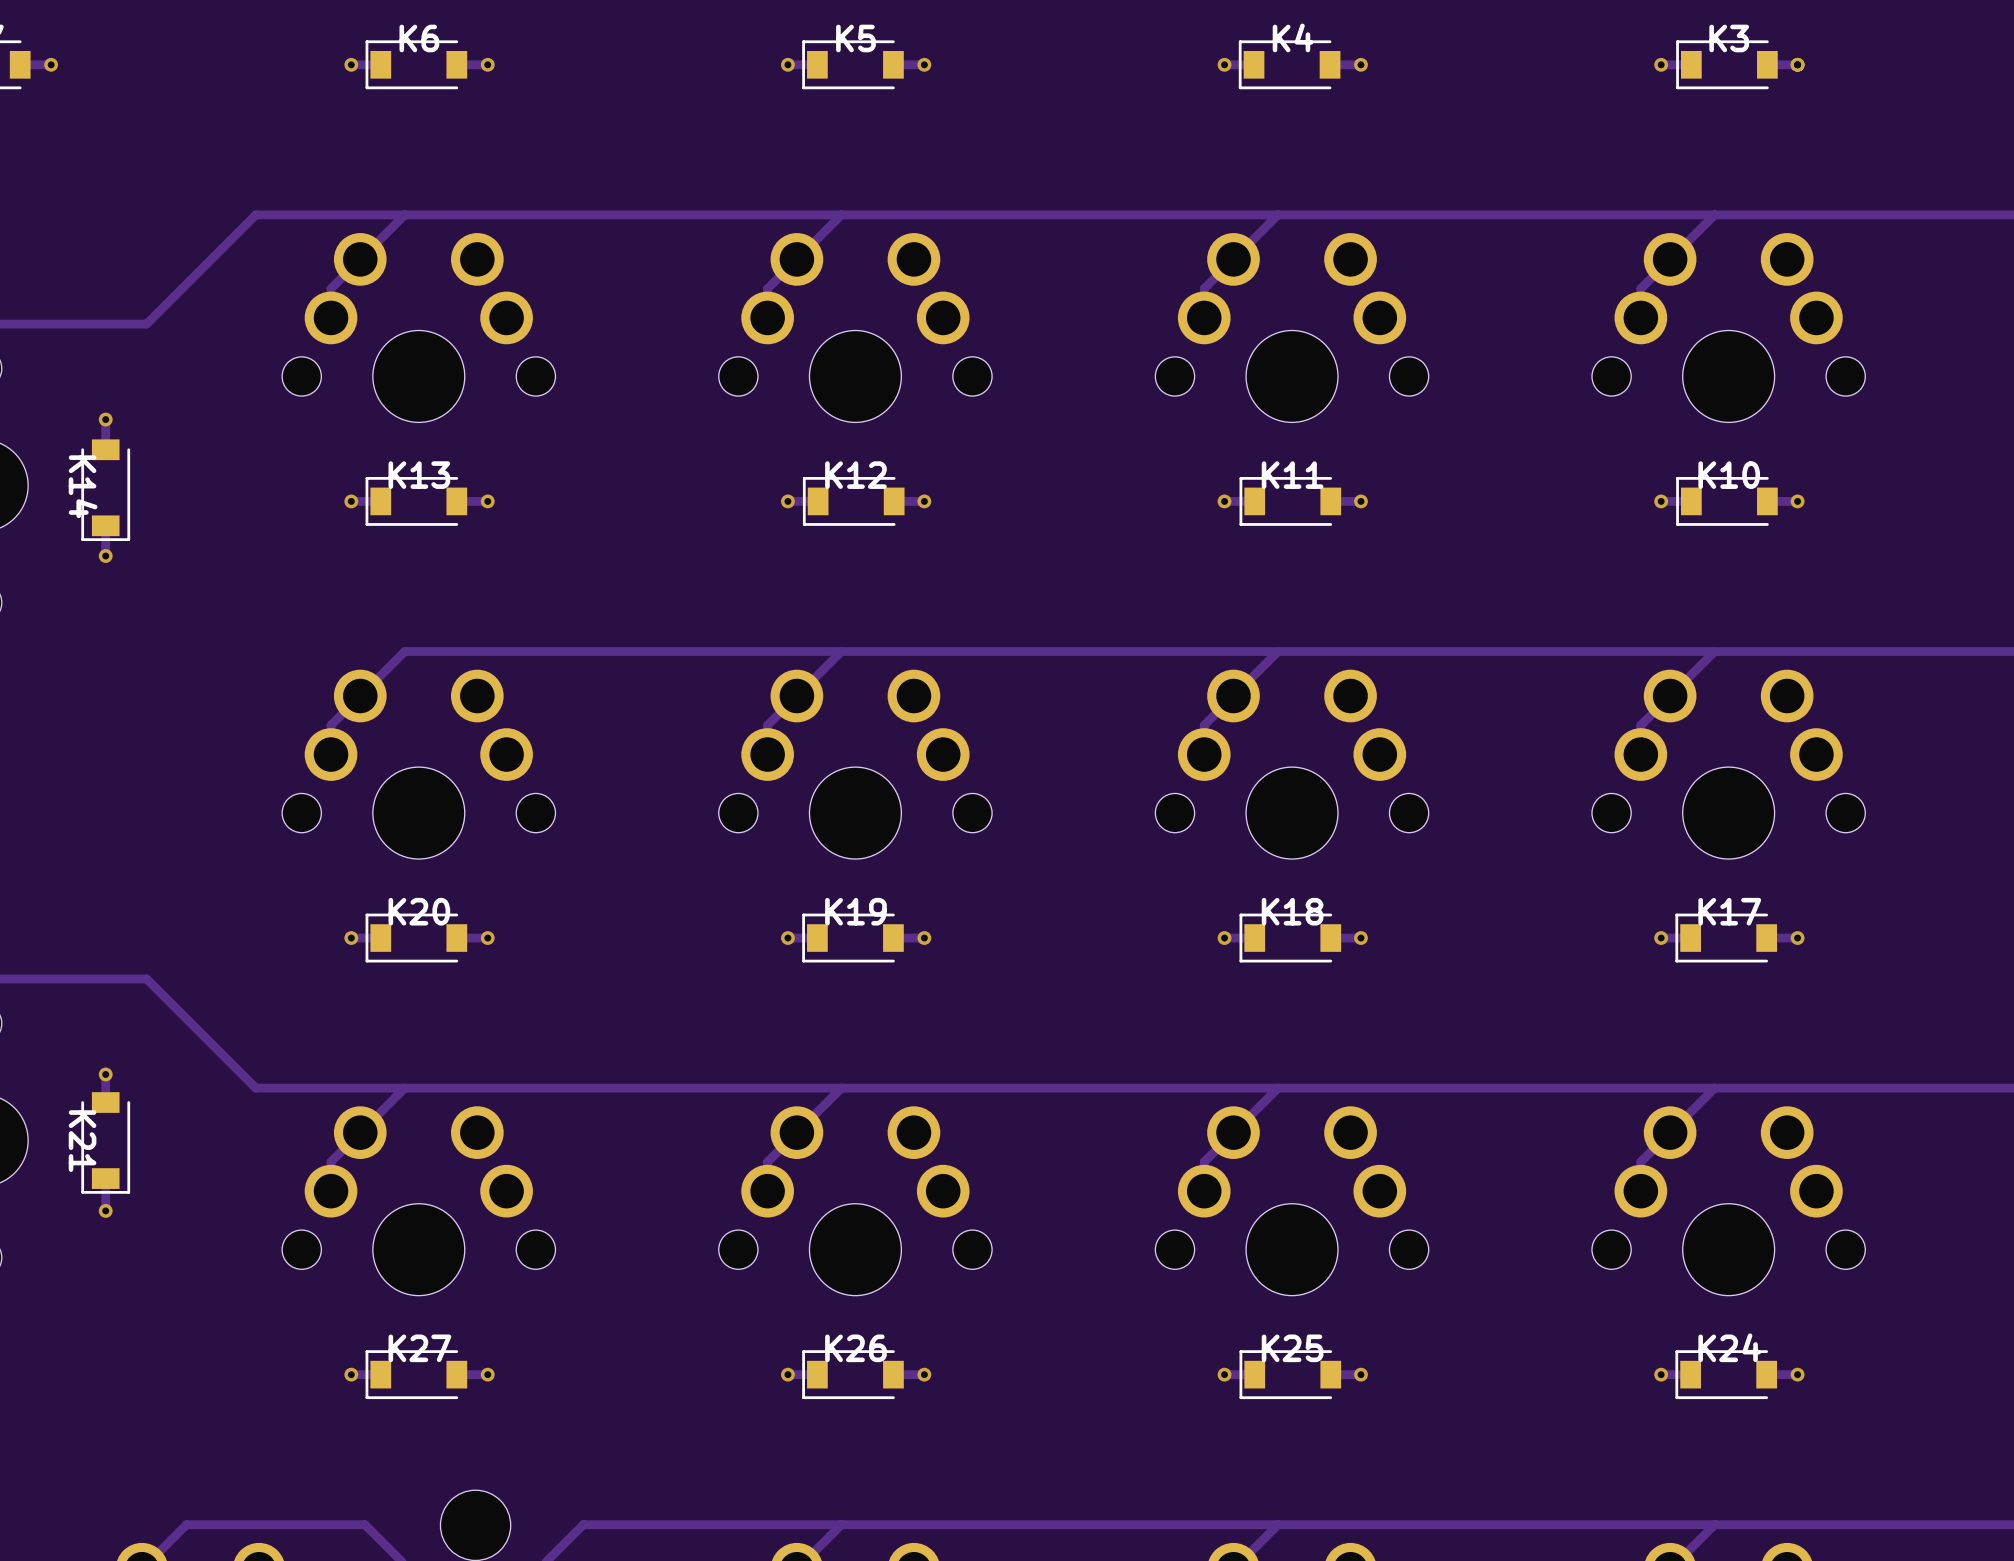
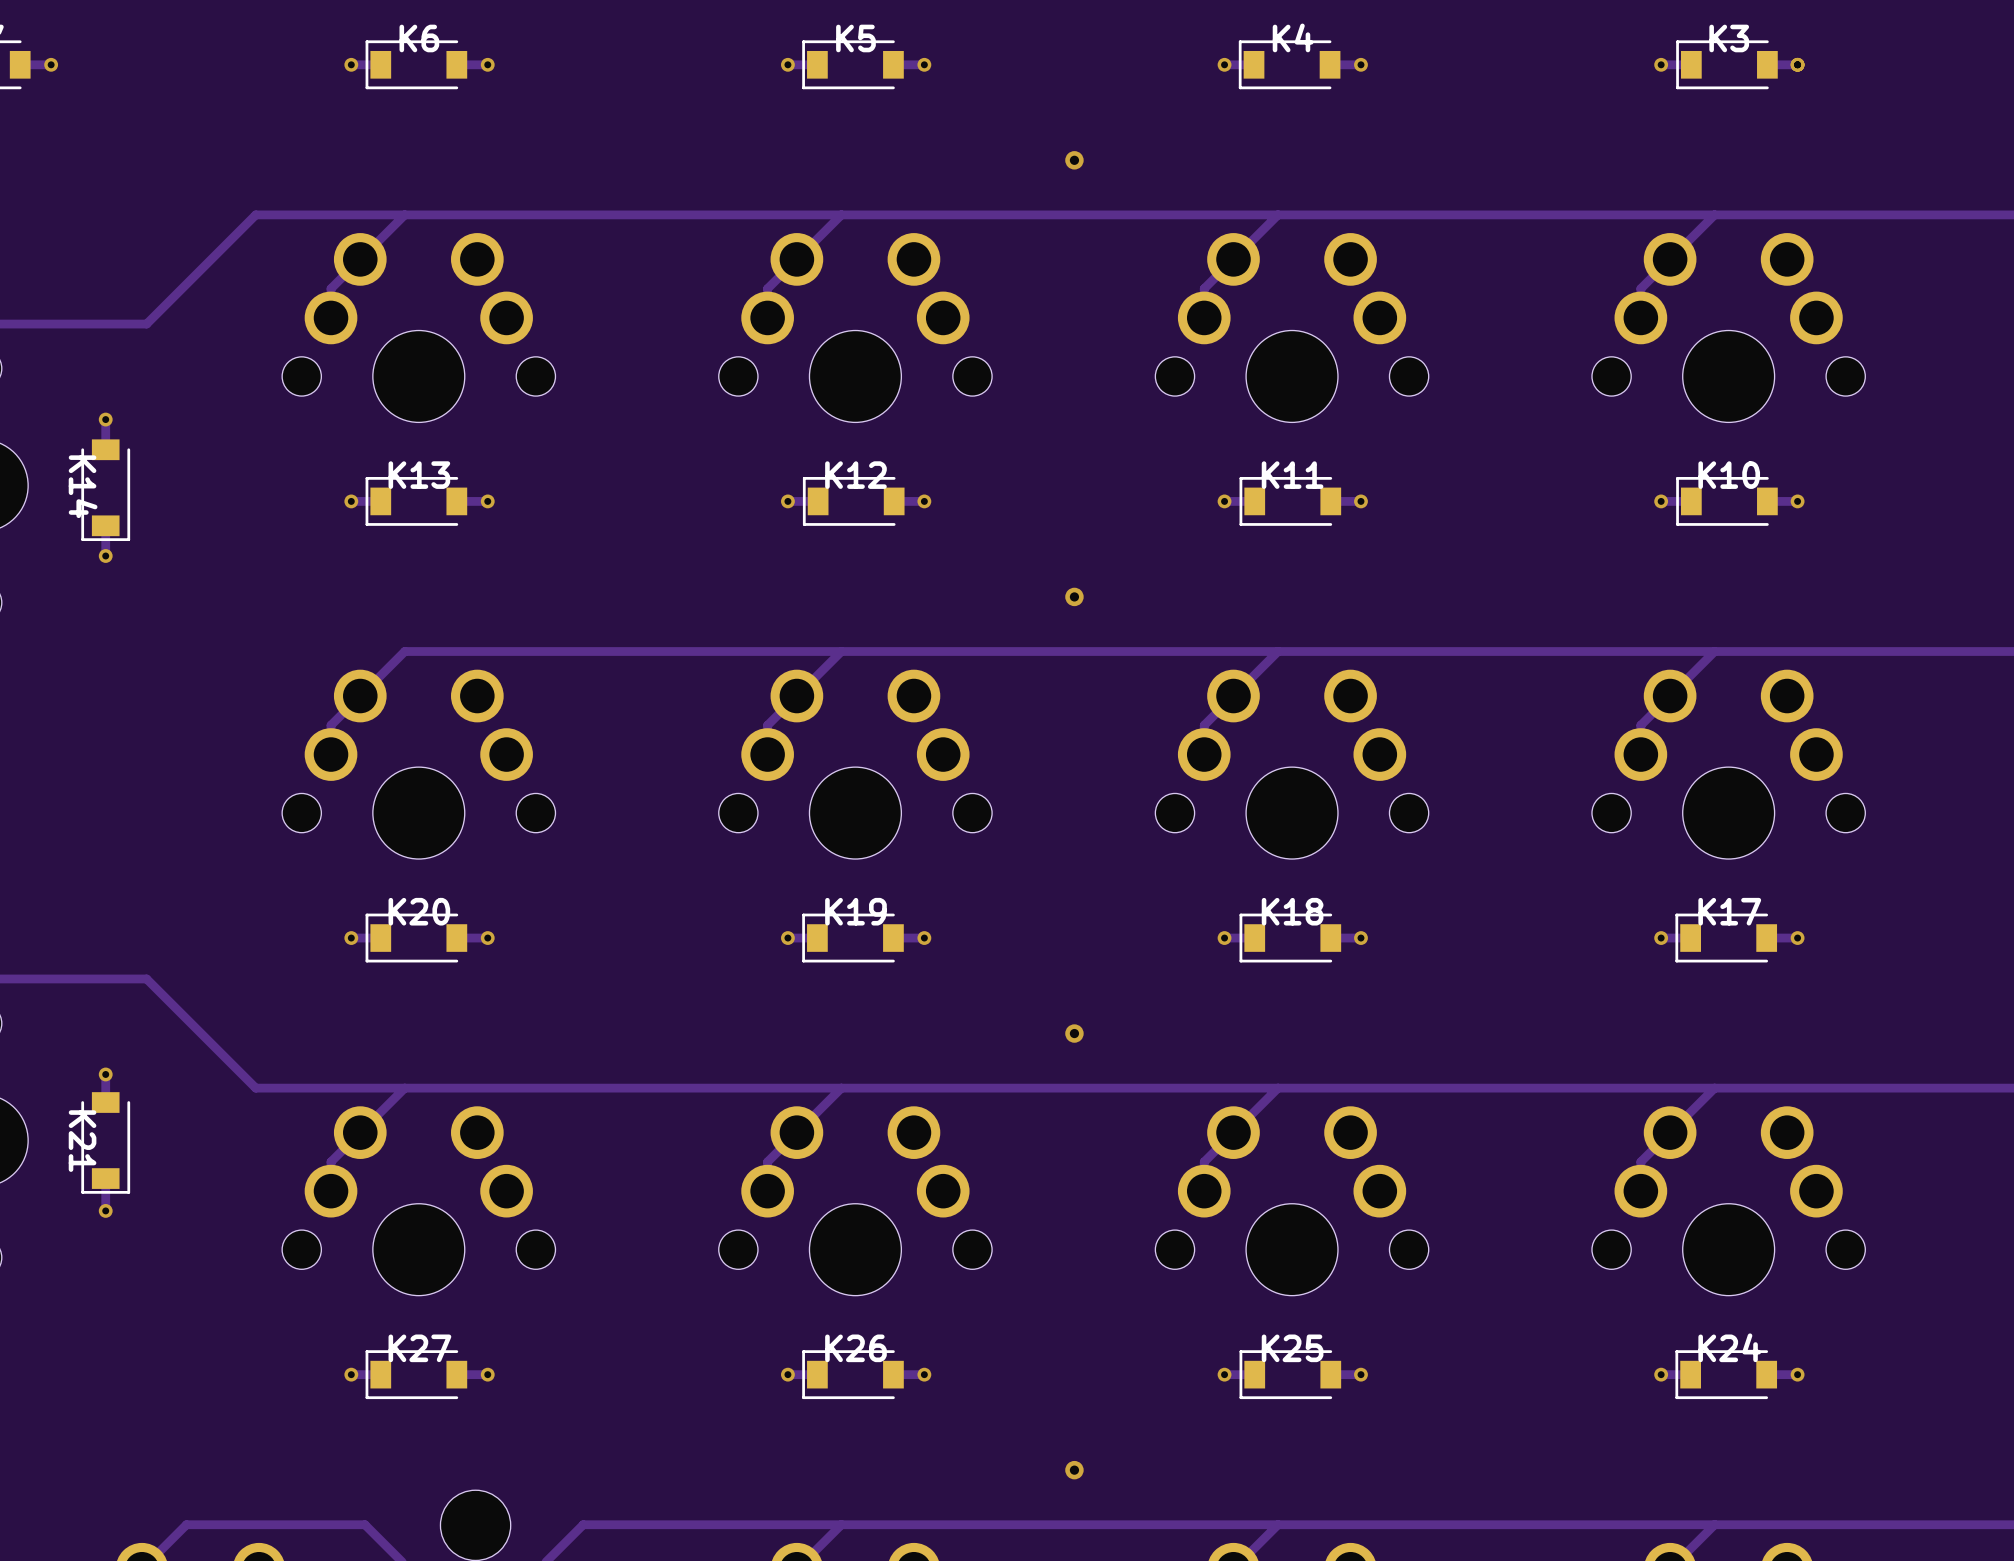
via: none -> (1074, 160)
via: none -> (1074, 596)
via: none -> (1074, 1033)
via: none -> (1074, 1470)

